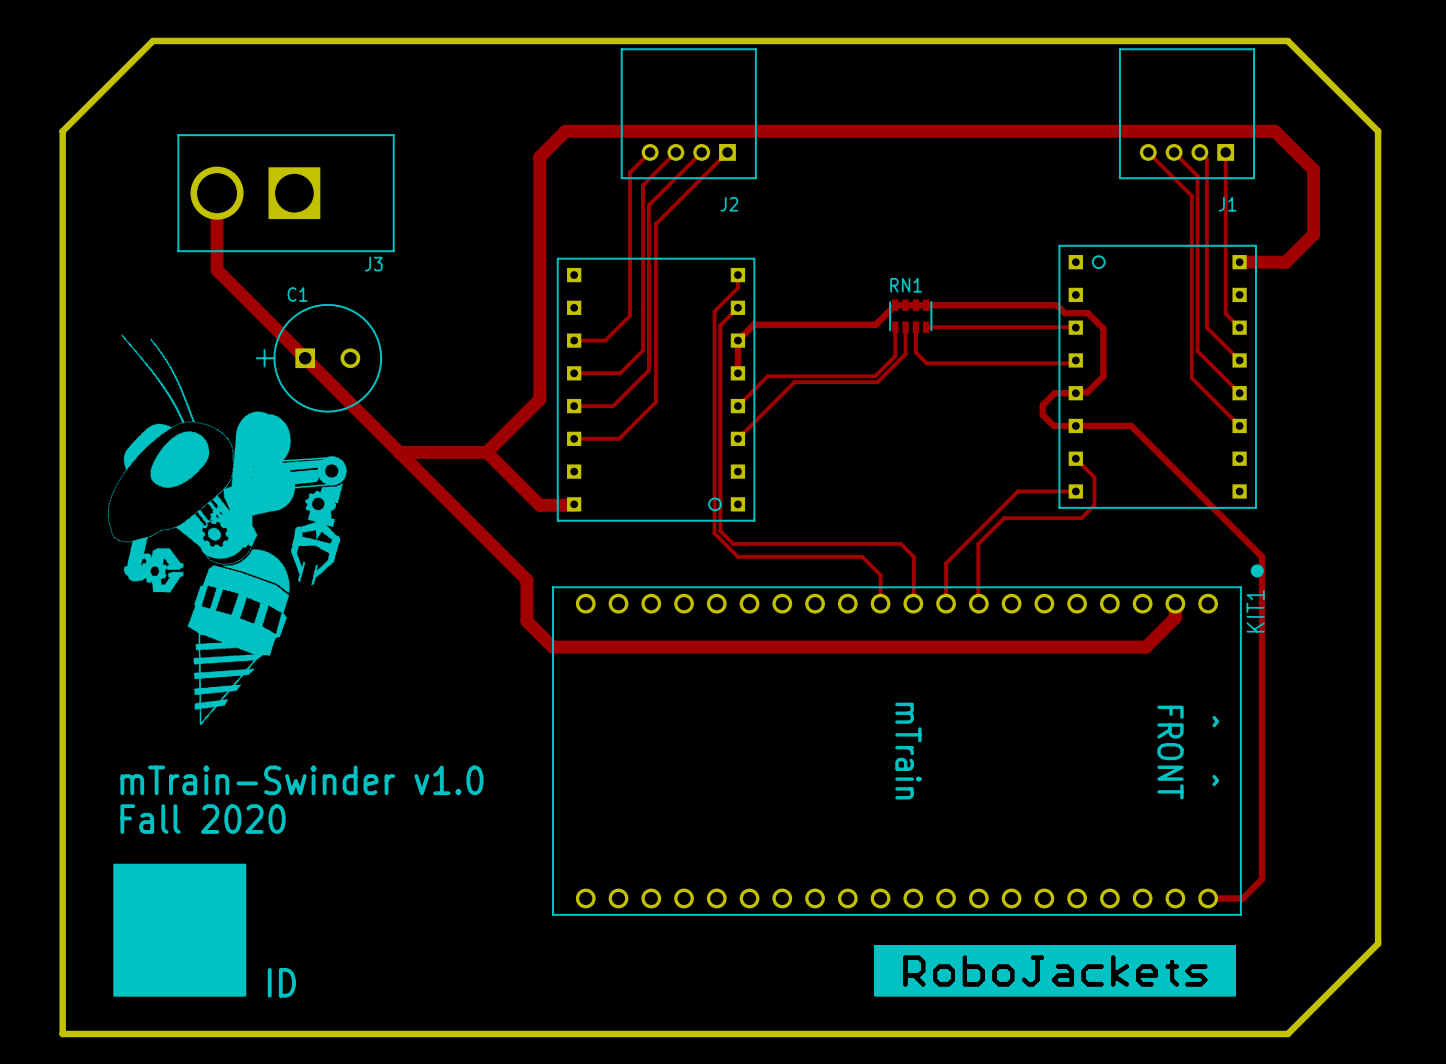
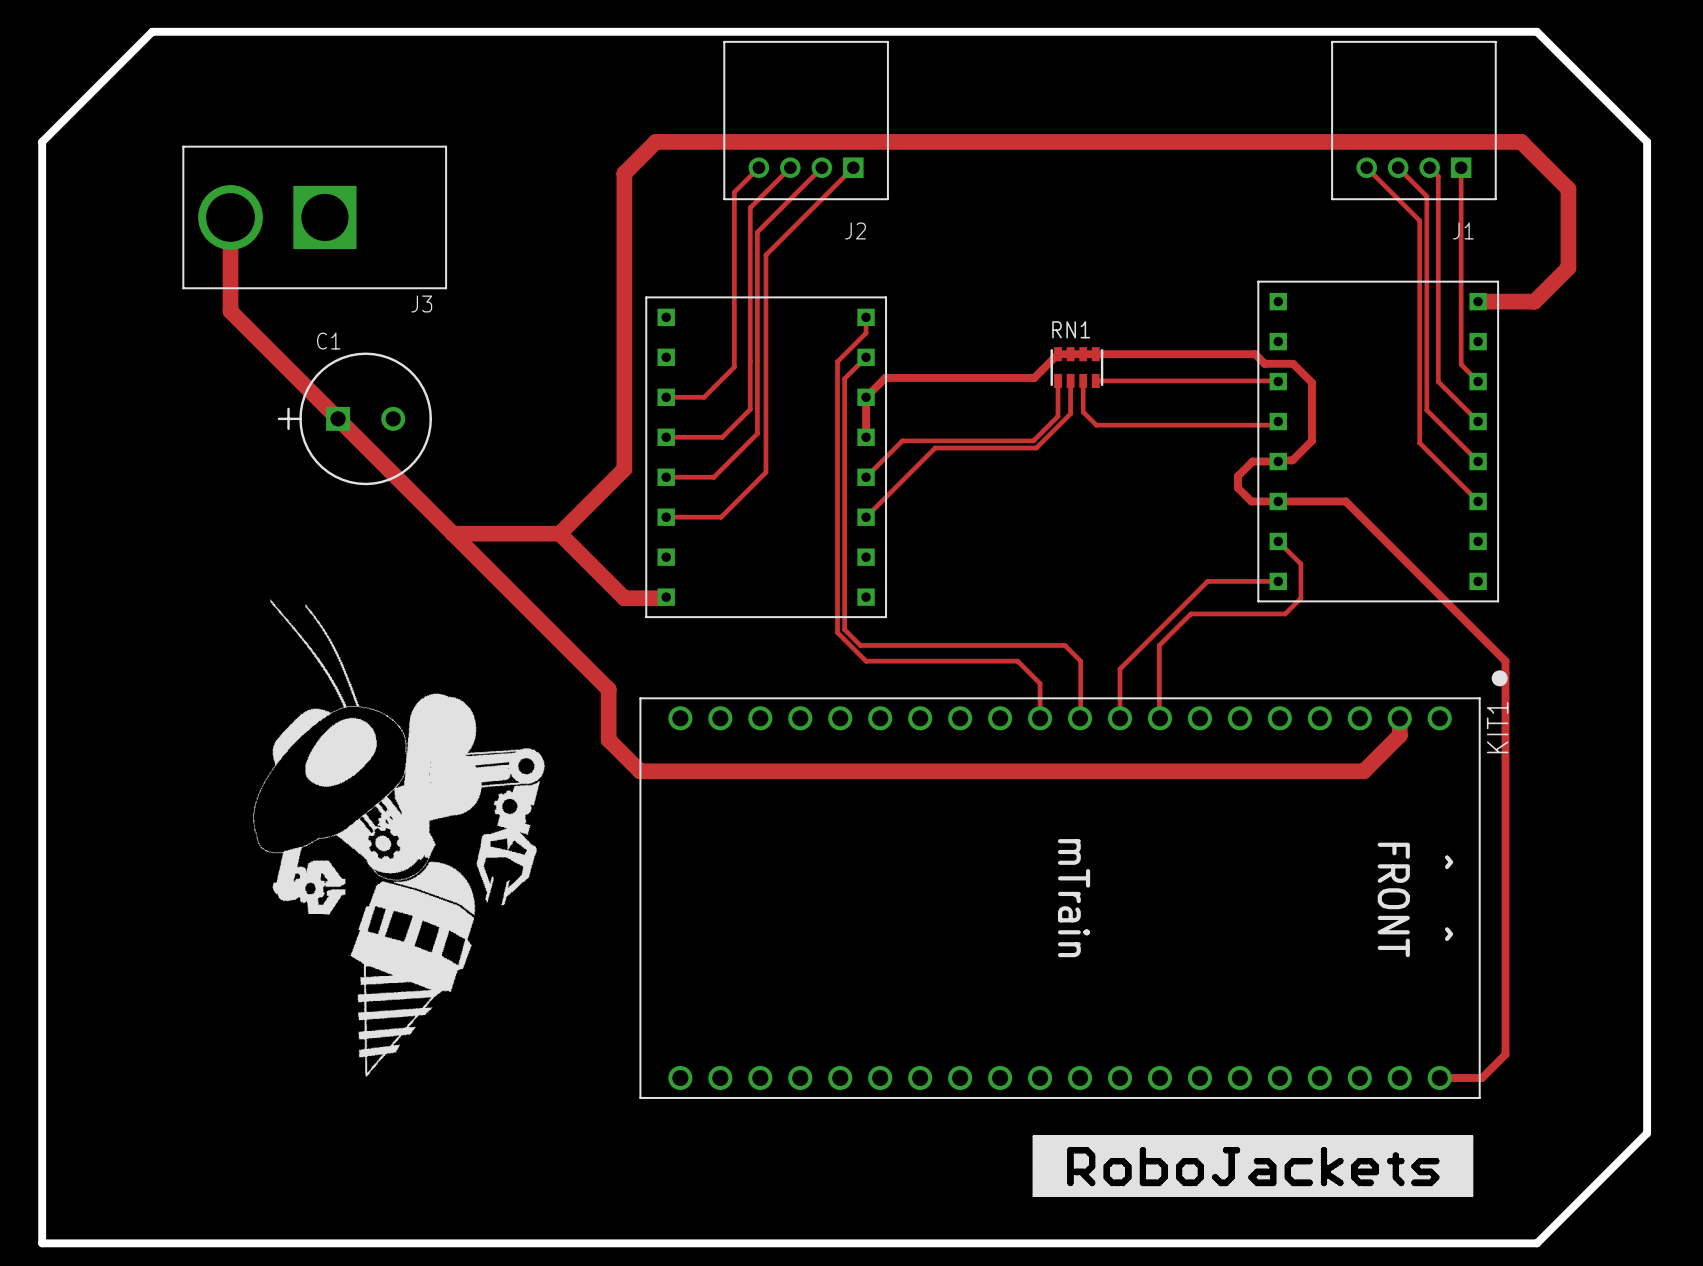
part footprint: [1058, 244, 1257, 509] -> [1257, 280, 1500, 603]
part footprint: [556, 257, 756, 522] -> [645, 296, 888, 619]
drawing position: (227, 529) -> (399, 837)
text: mTrain-Swinder v1.0 (301, 780) -> none
text: Fall 2020 (203, 819) -> none
drawing: [113, 863, 247, 997] -> none
text: ID (281, 982) -> none

